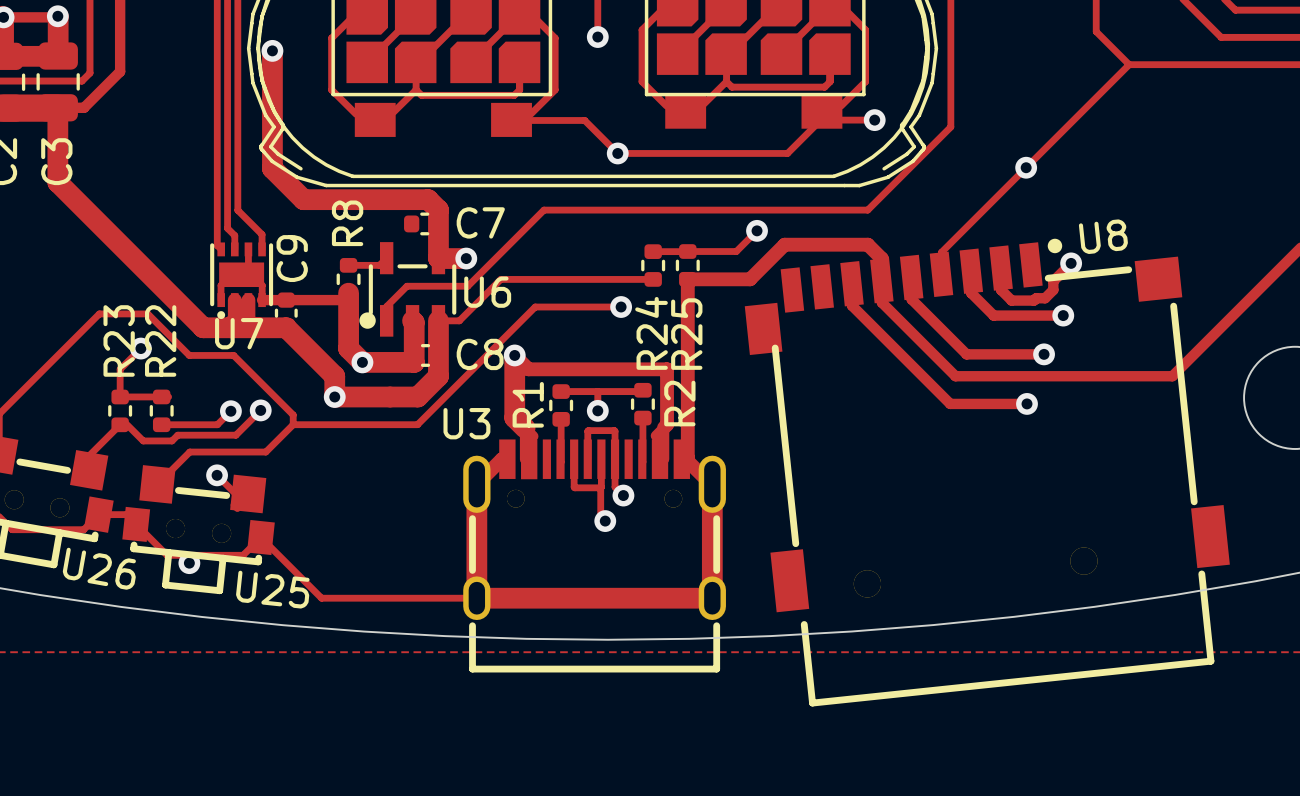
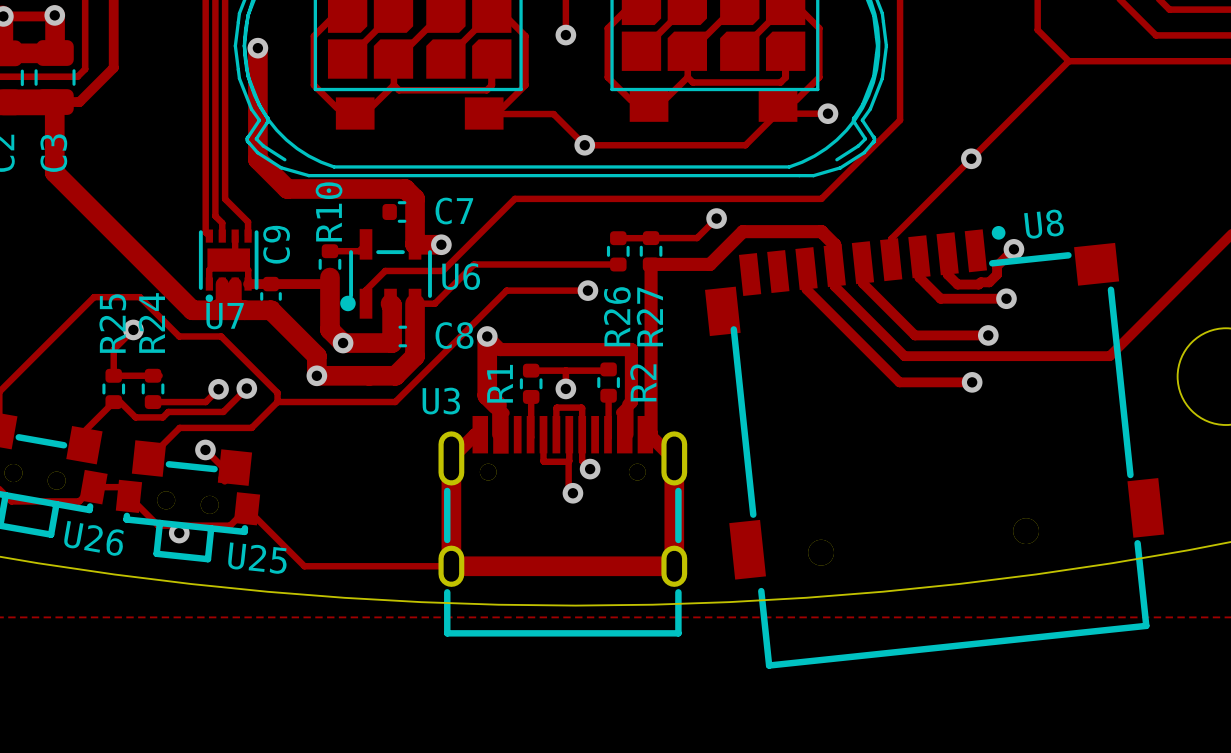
R8 name: R8 (347, 223) -> R10 (329, 211)
R24 name: R24 (651, 333) -> R26 (617, 316)
R25 name: R25 (686, 334) -> R27 (649, 316)
R23 name: R23 (119, 340) -> R25 (112, 323)
R22 name: R22 (160, 340) -> R24 (151, 322)

